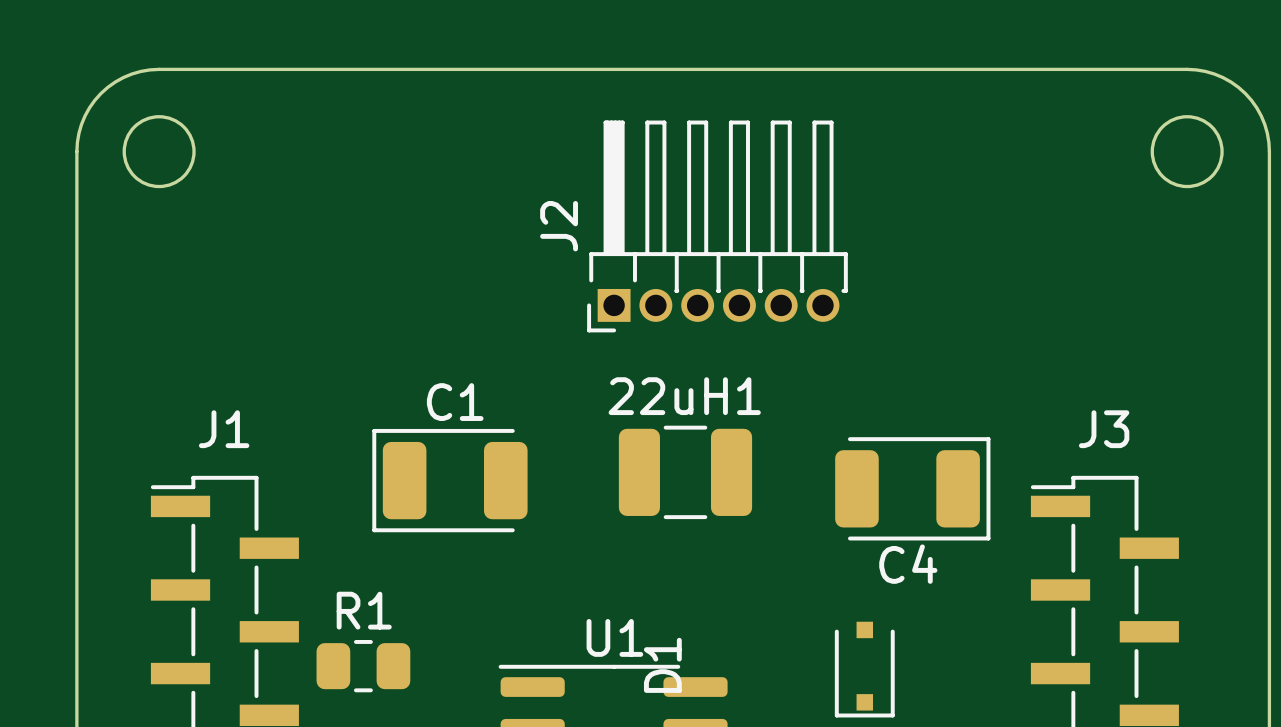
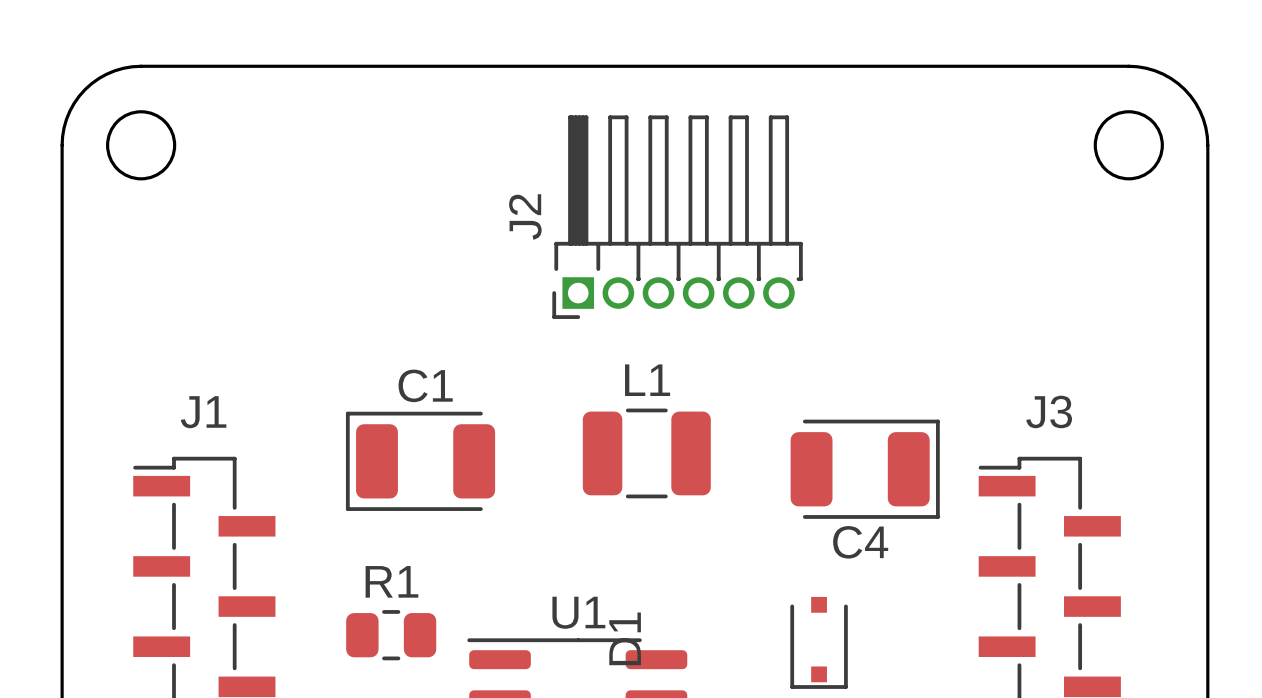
22uH1 name: 22uH1 (684, 396) -> L1 (647, 380)
R1 position: (363, 666) -> (391, 635)

